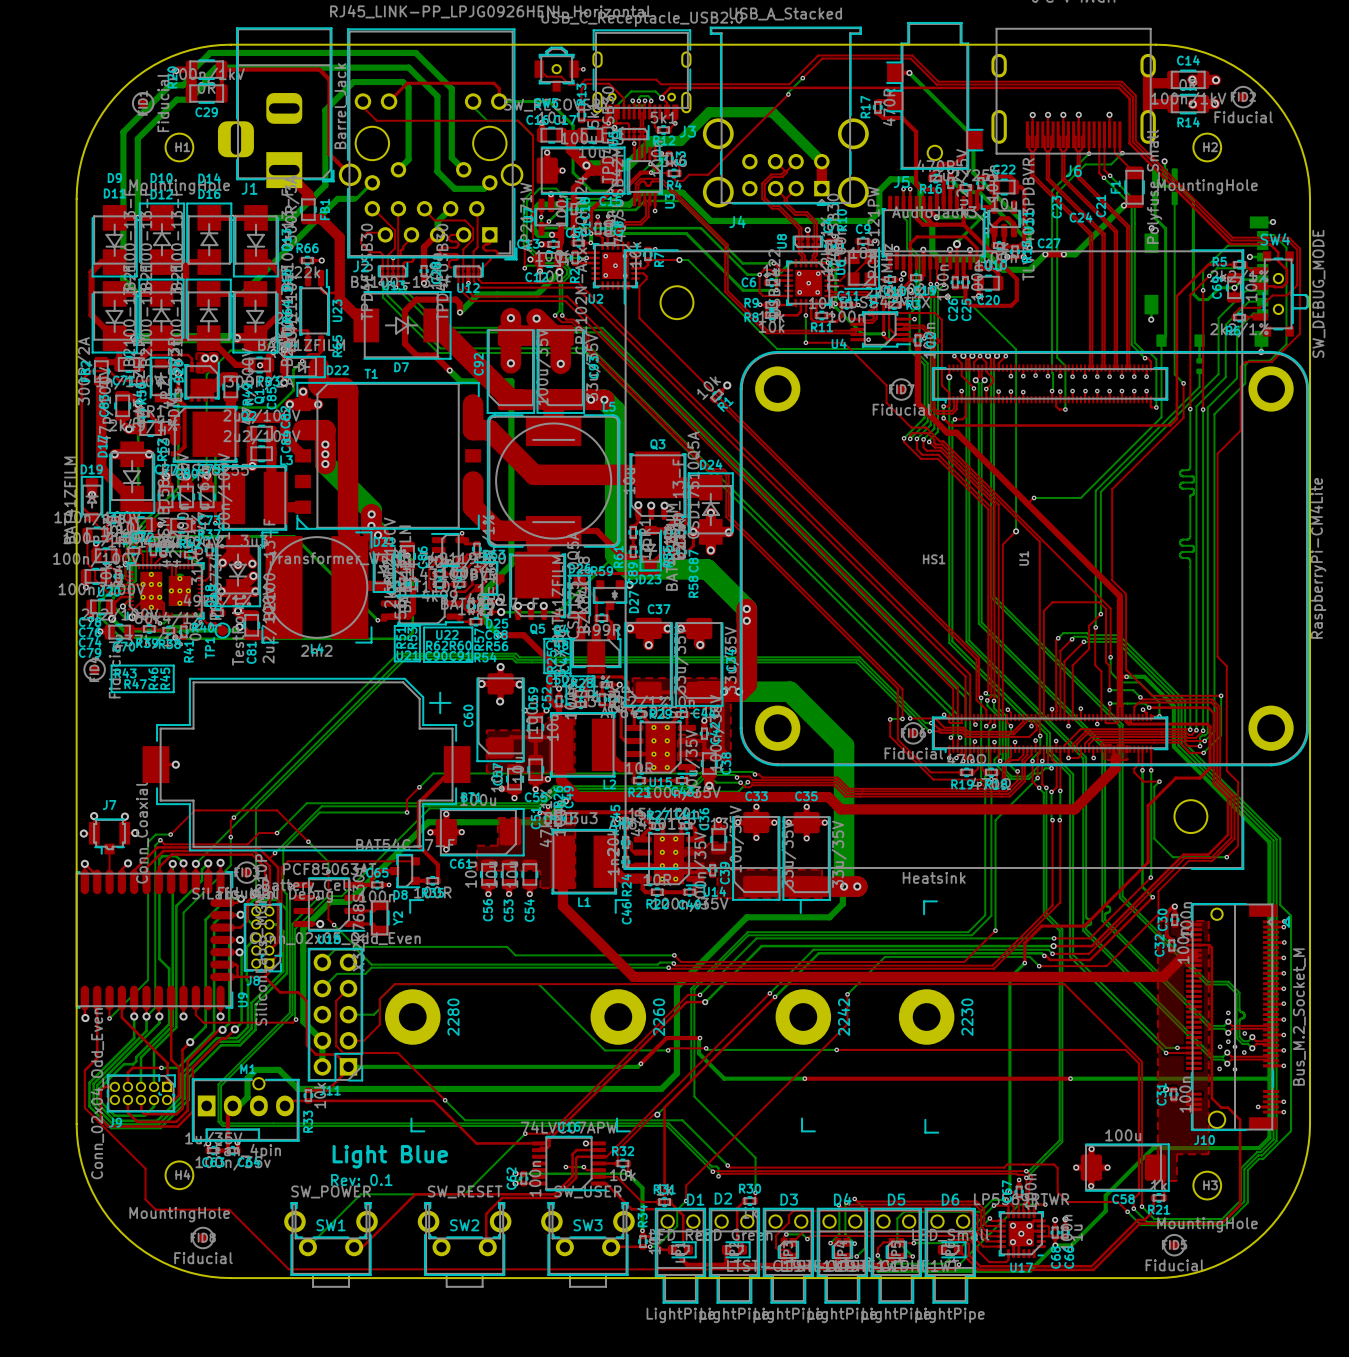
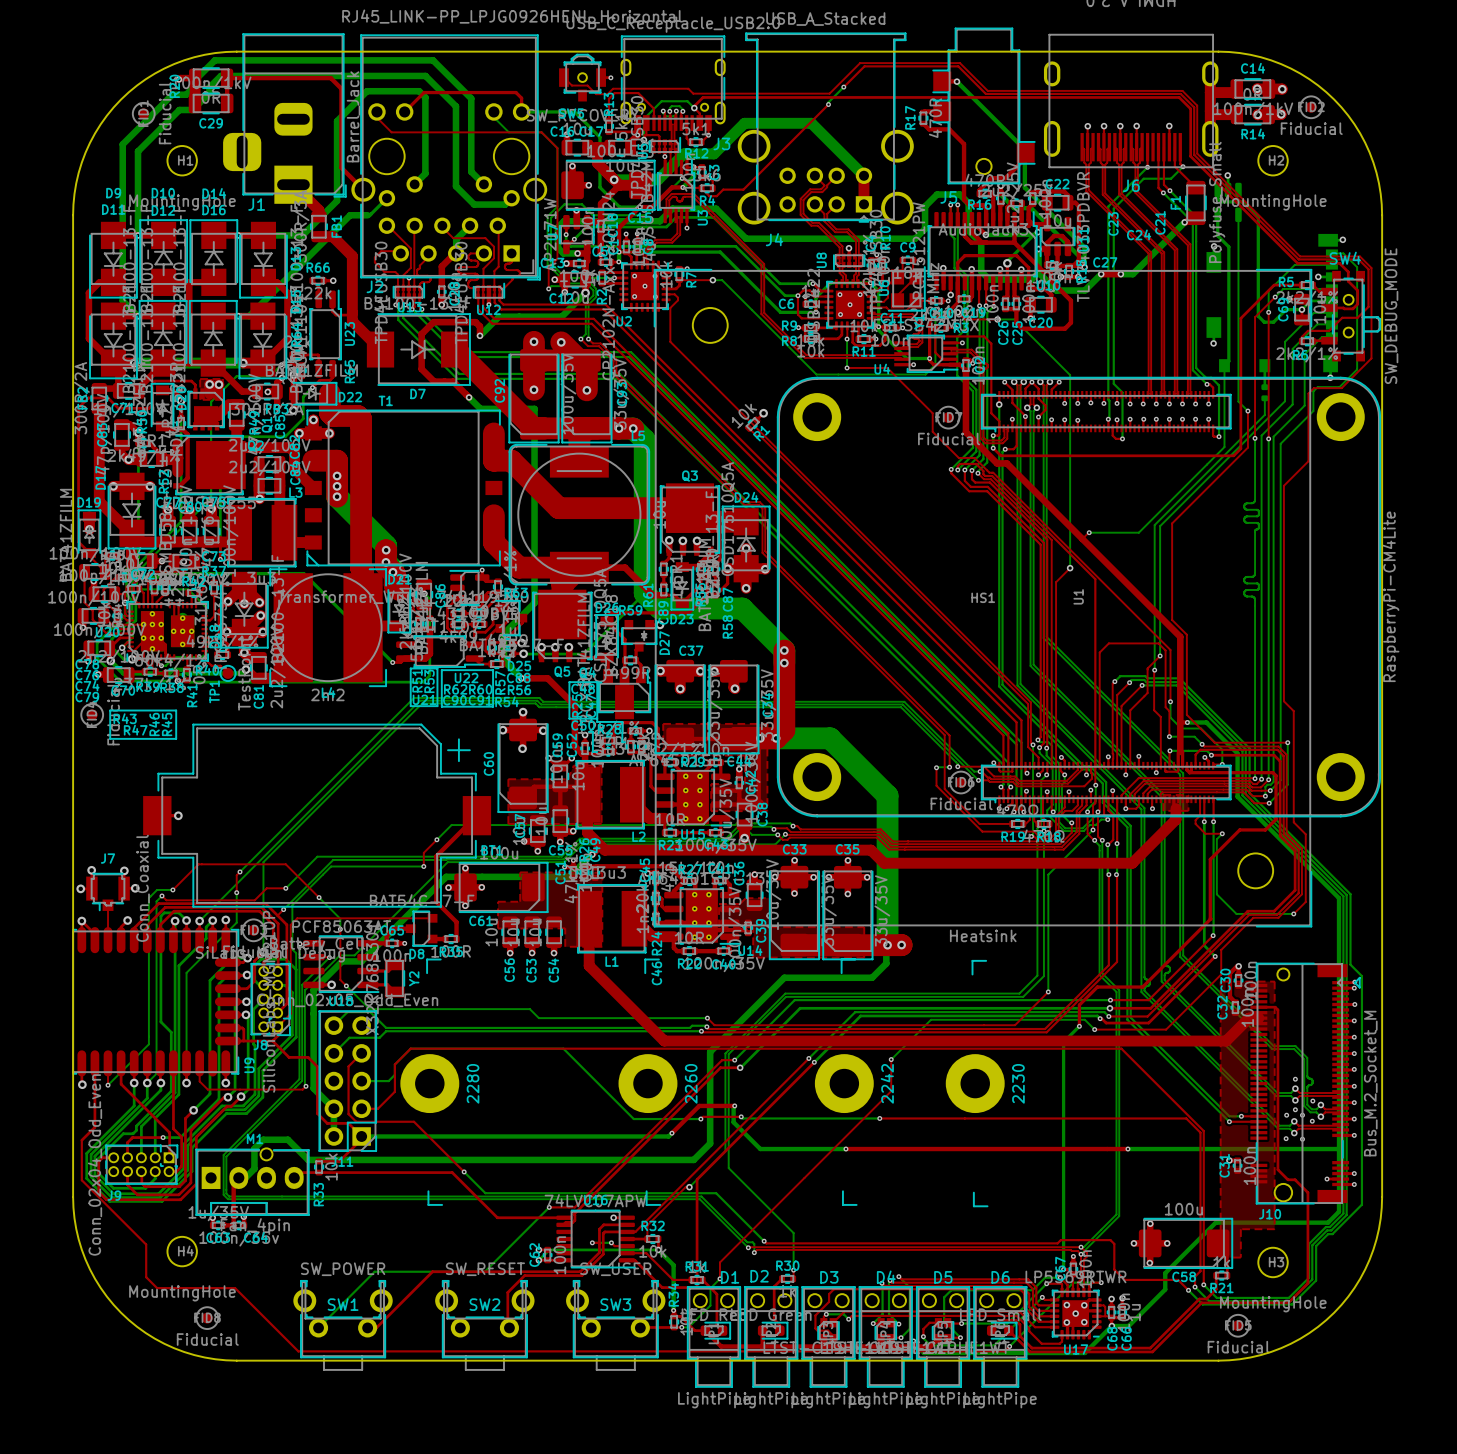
text: Light Blue (390, 1156) -> none
text: Rev: 0.1 (361, 1180) -> none

